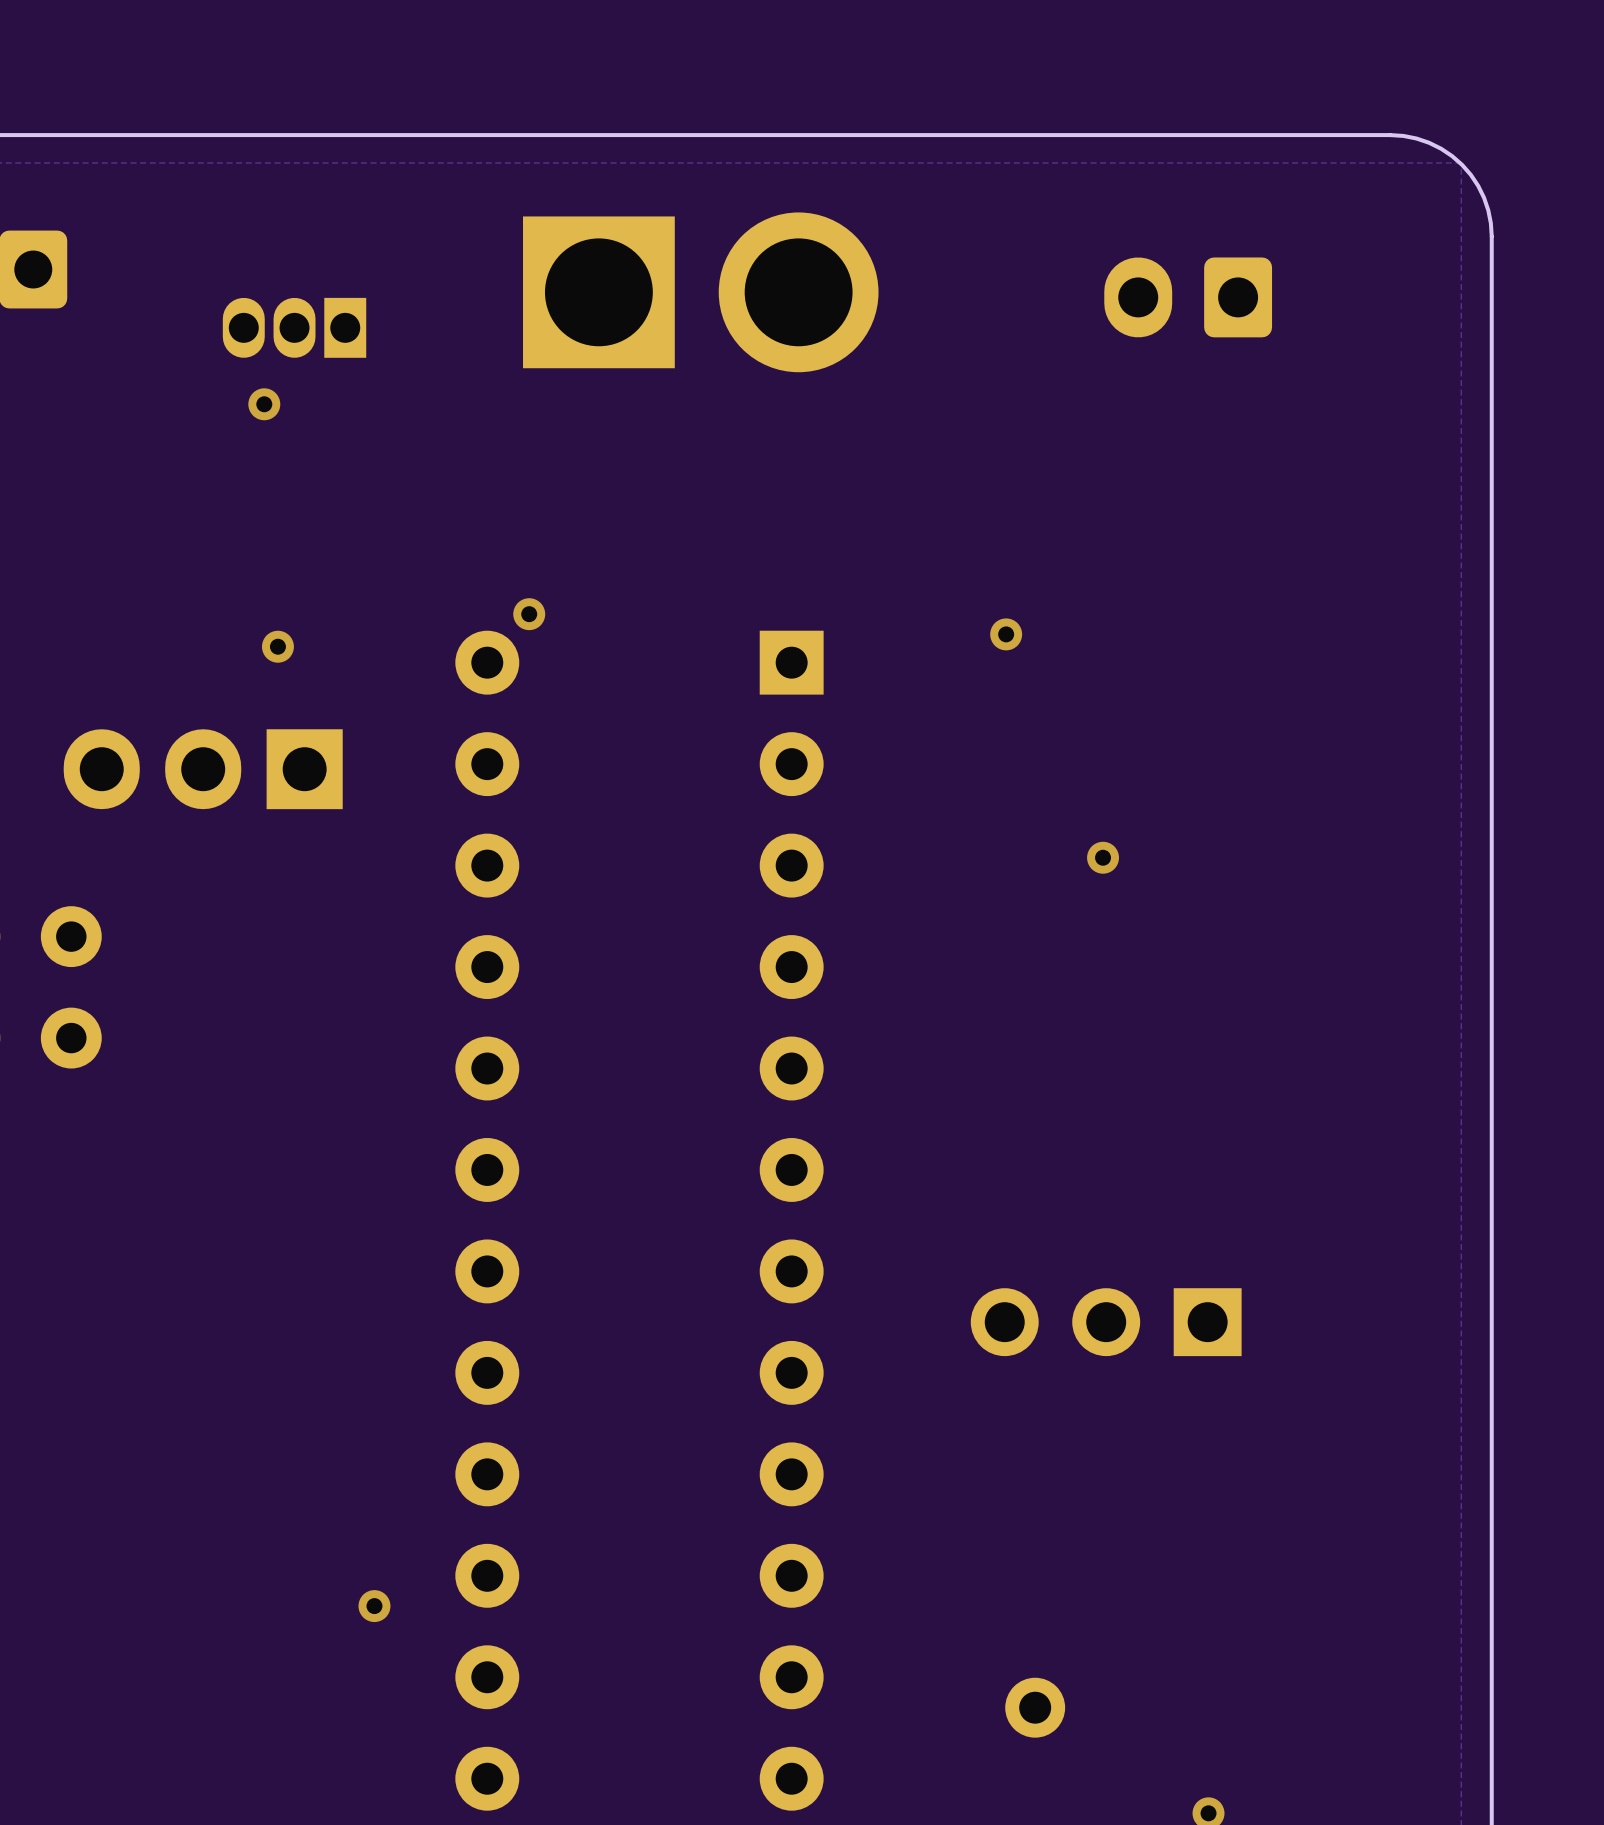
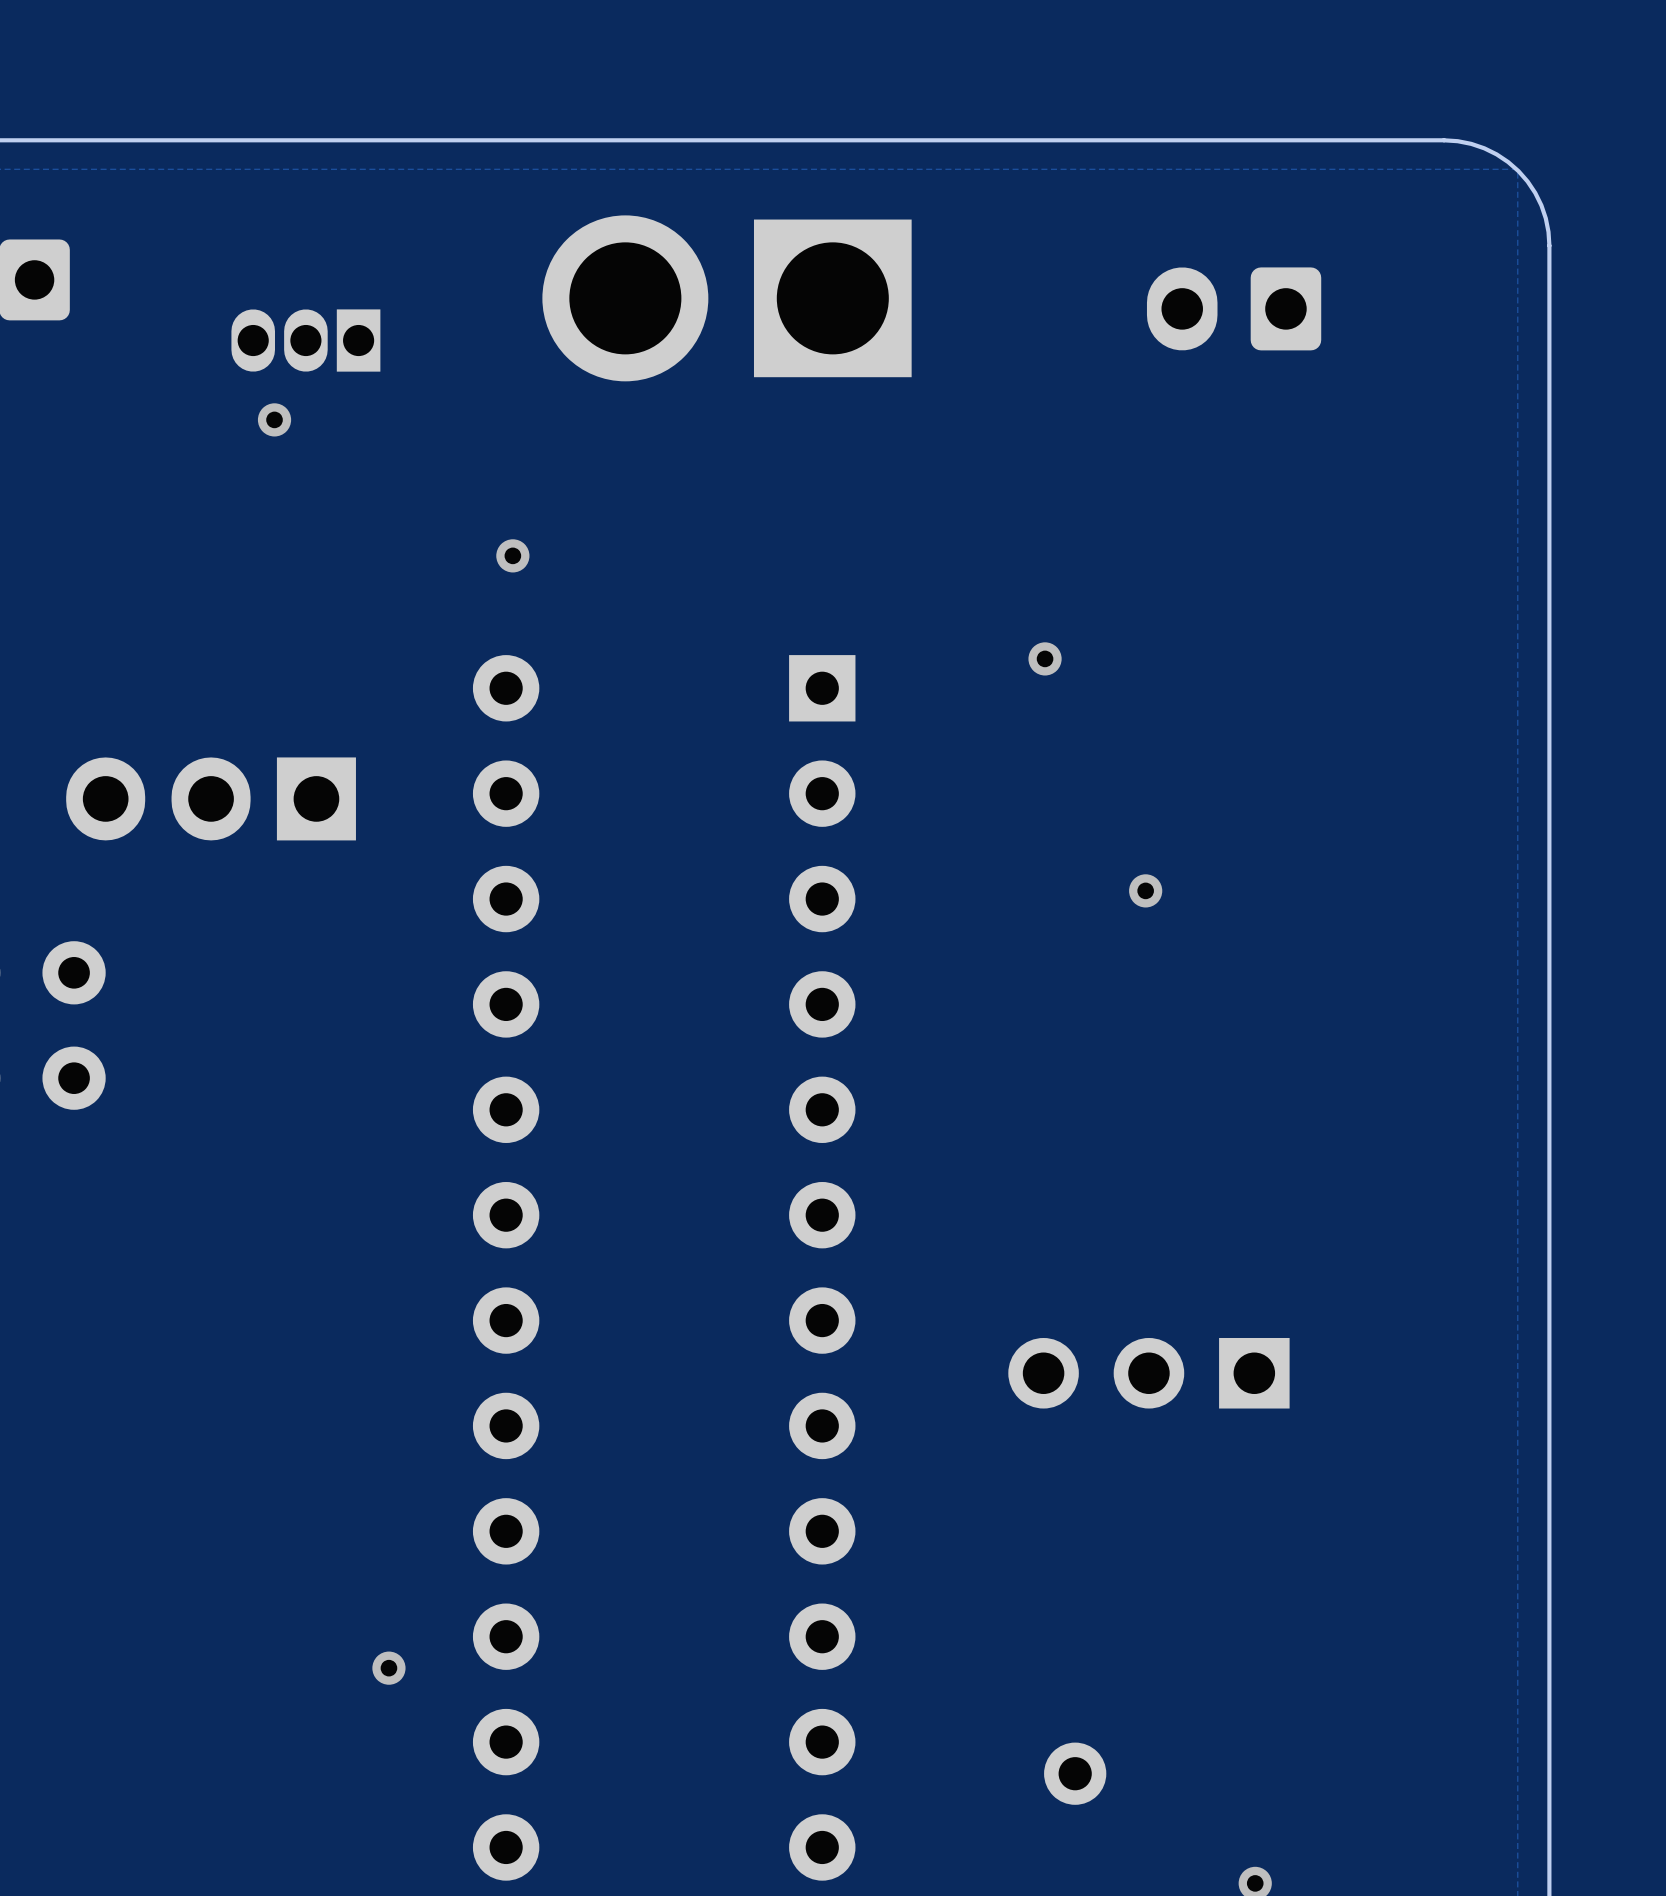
part rotation: 0° (700, 292) -> 180° (727, 298)
via position: (529, 614) -> (512, 555)
via: (277, 646) -> none

